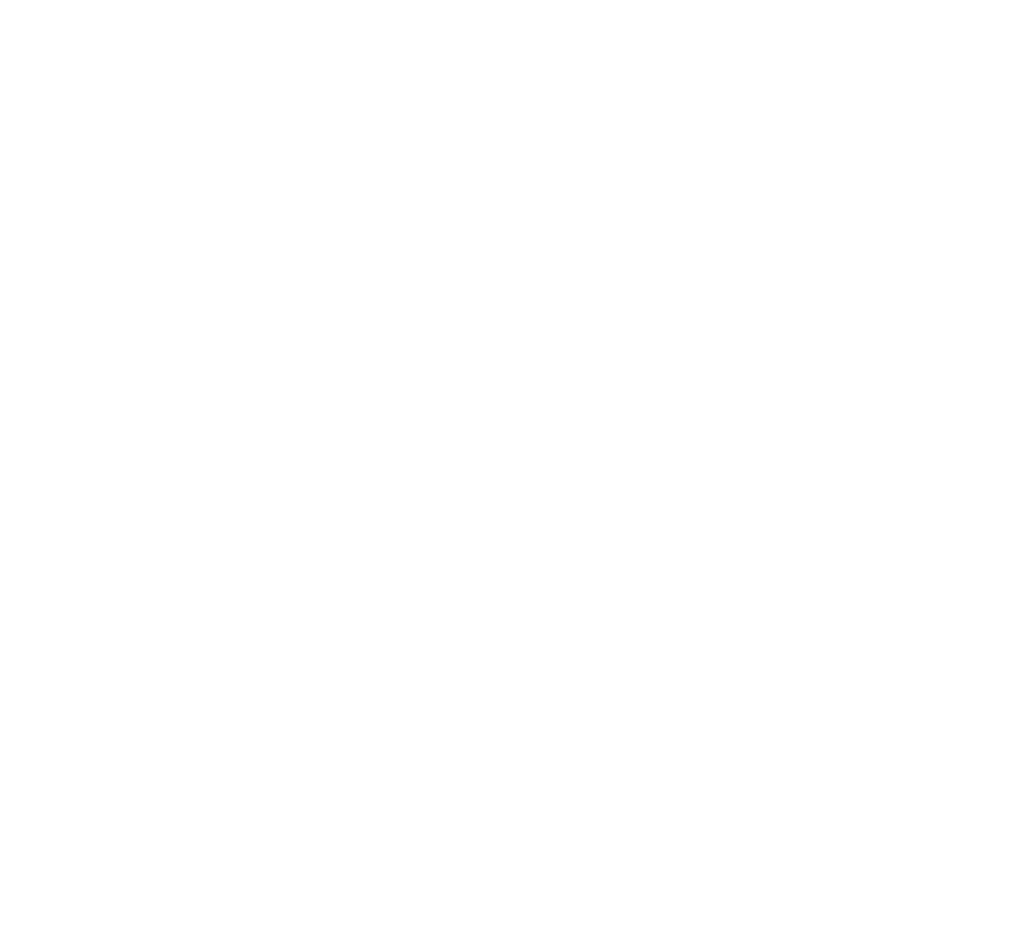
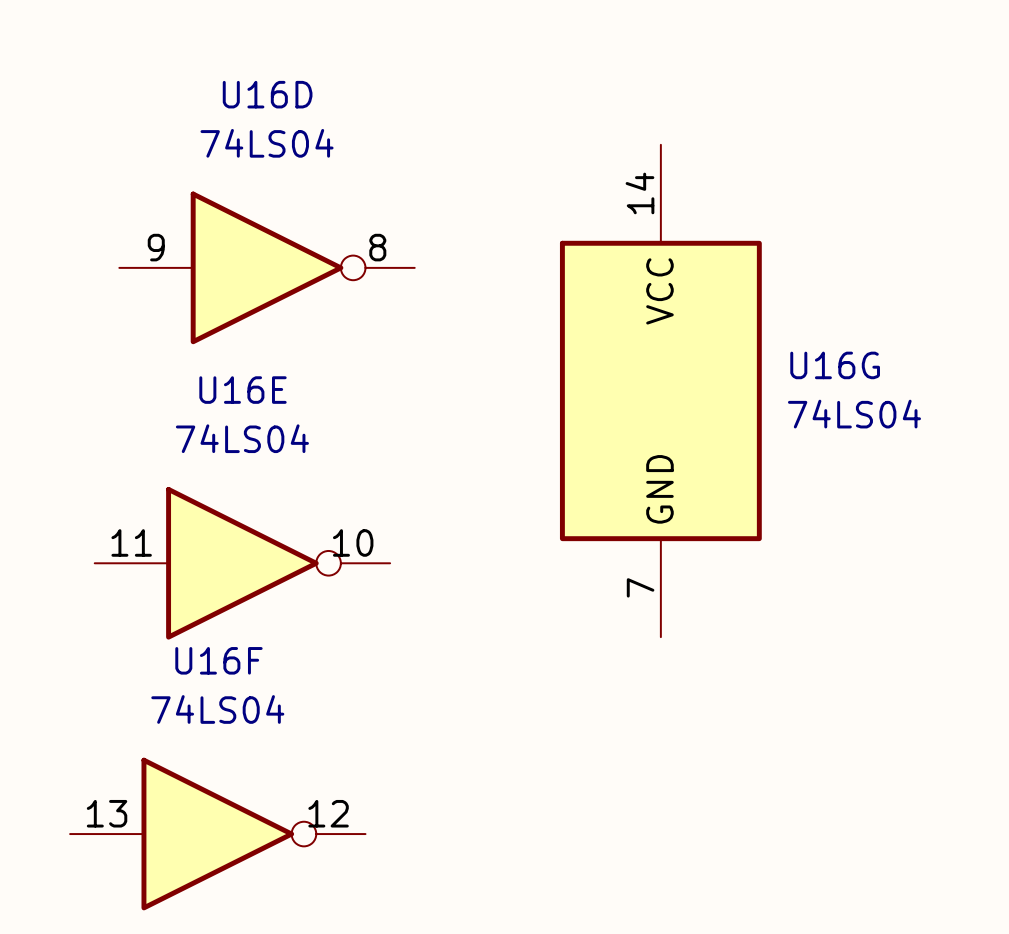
U16D: none -> 74LS04 (267, 267)
U16G: none -> 74LS04 (660, 390)
U16E: none -> 74LS04 (242, 563)
U16F: none -> 74LS04 (217, 834)

